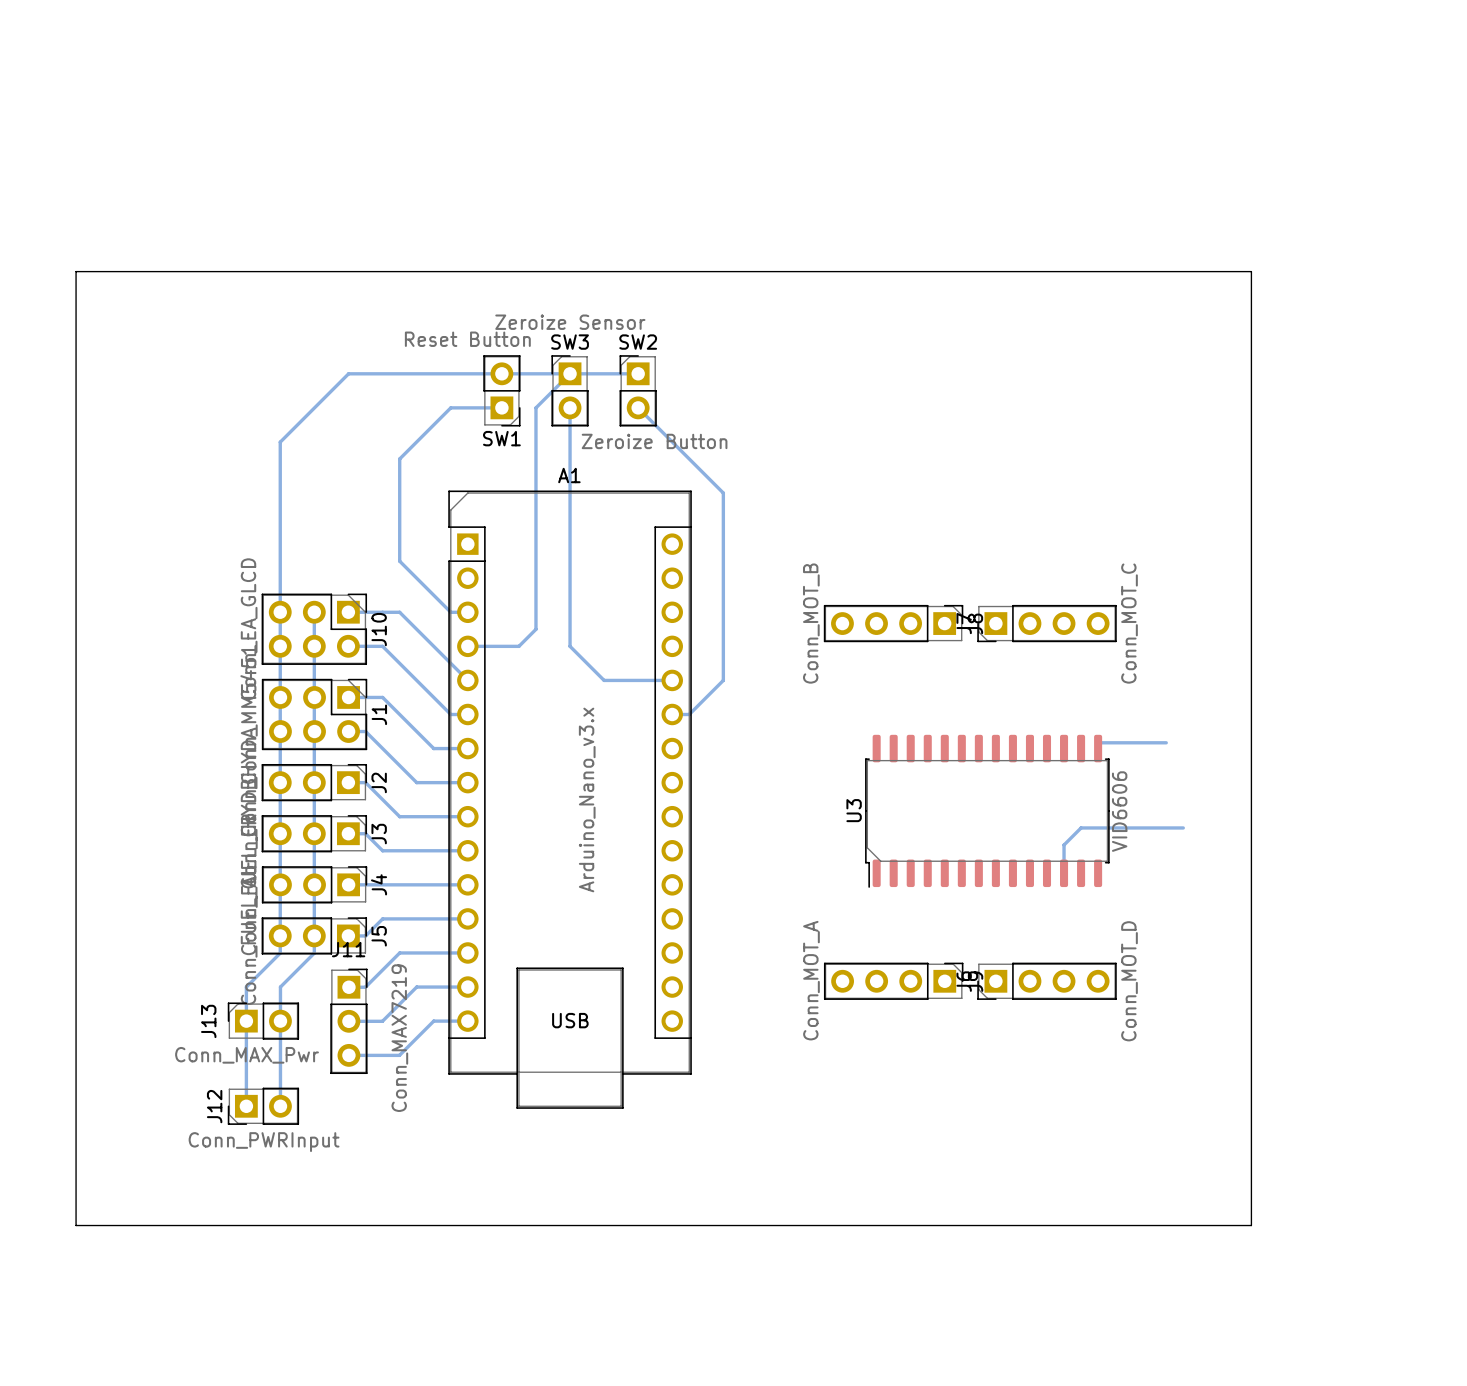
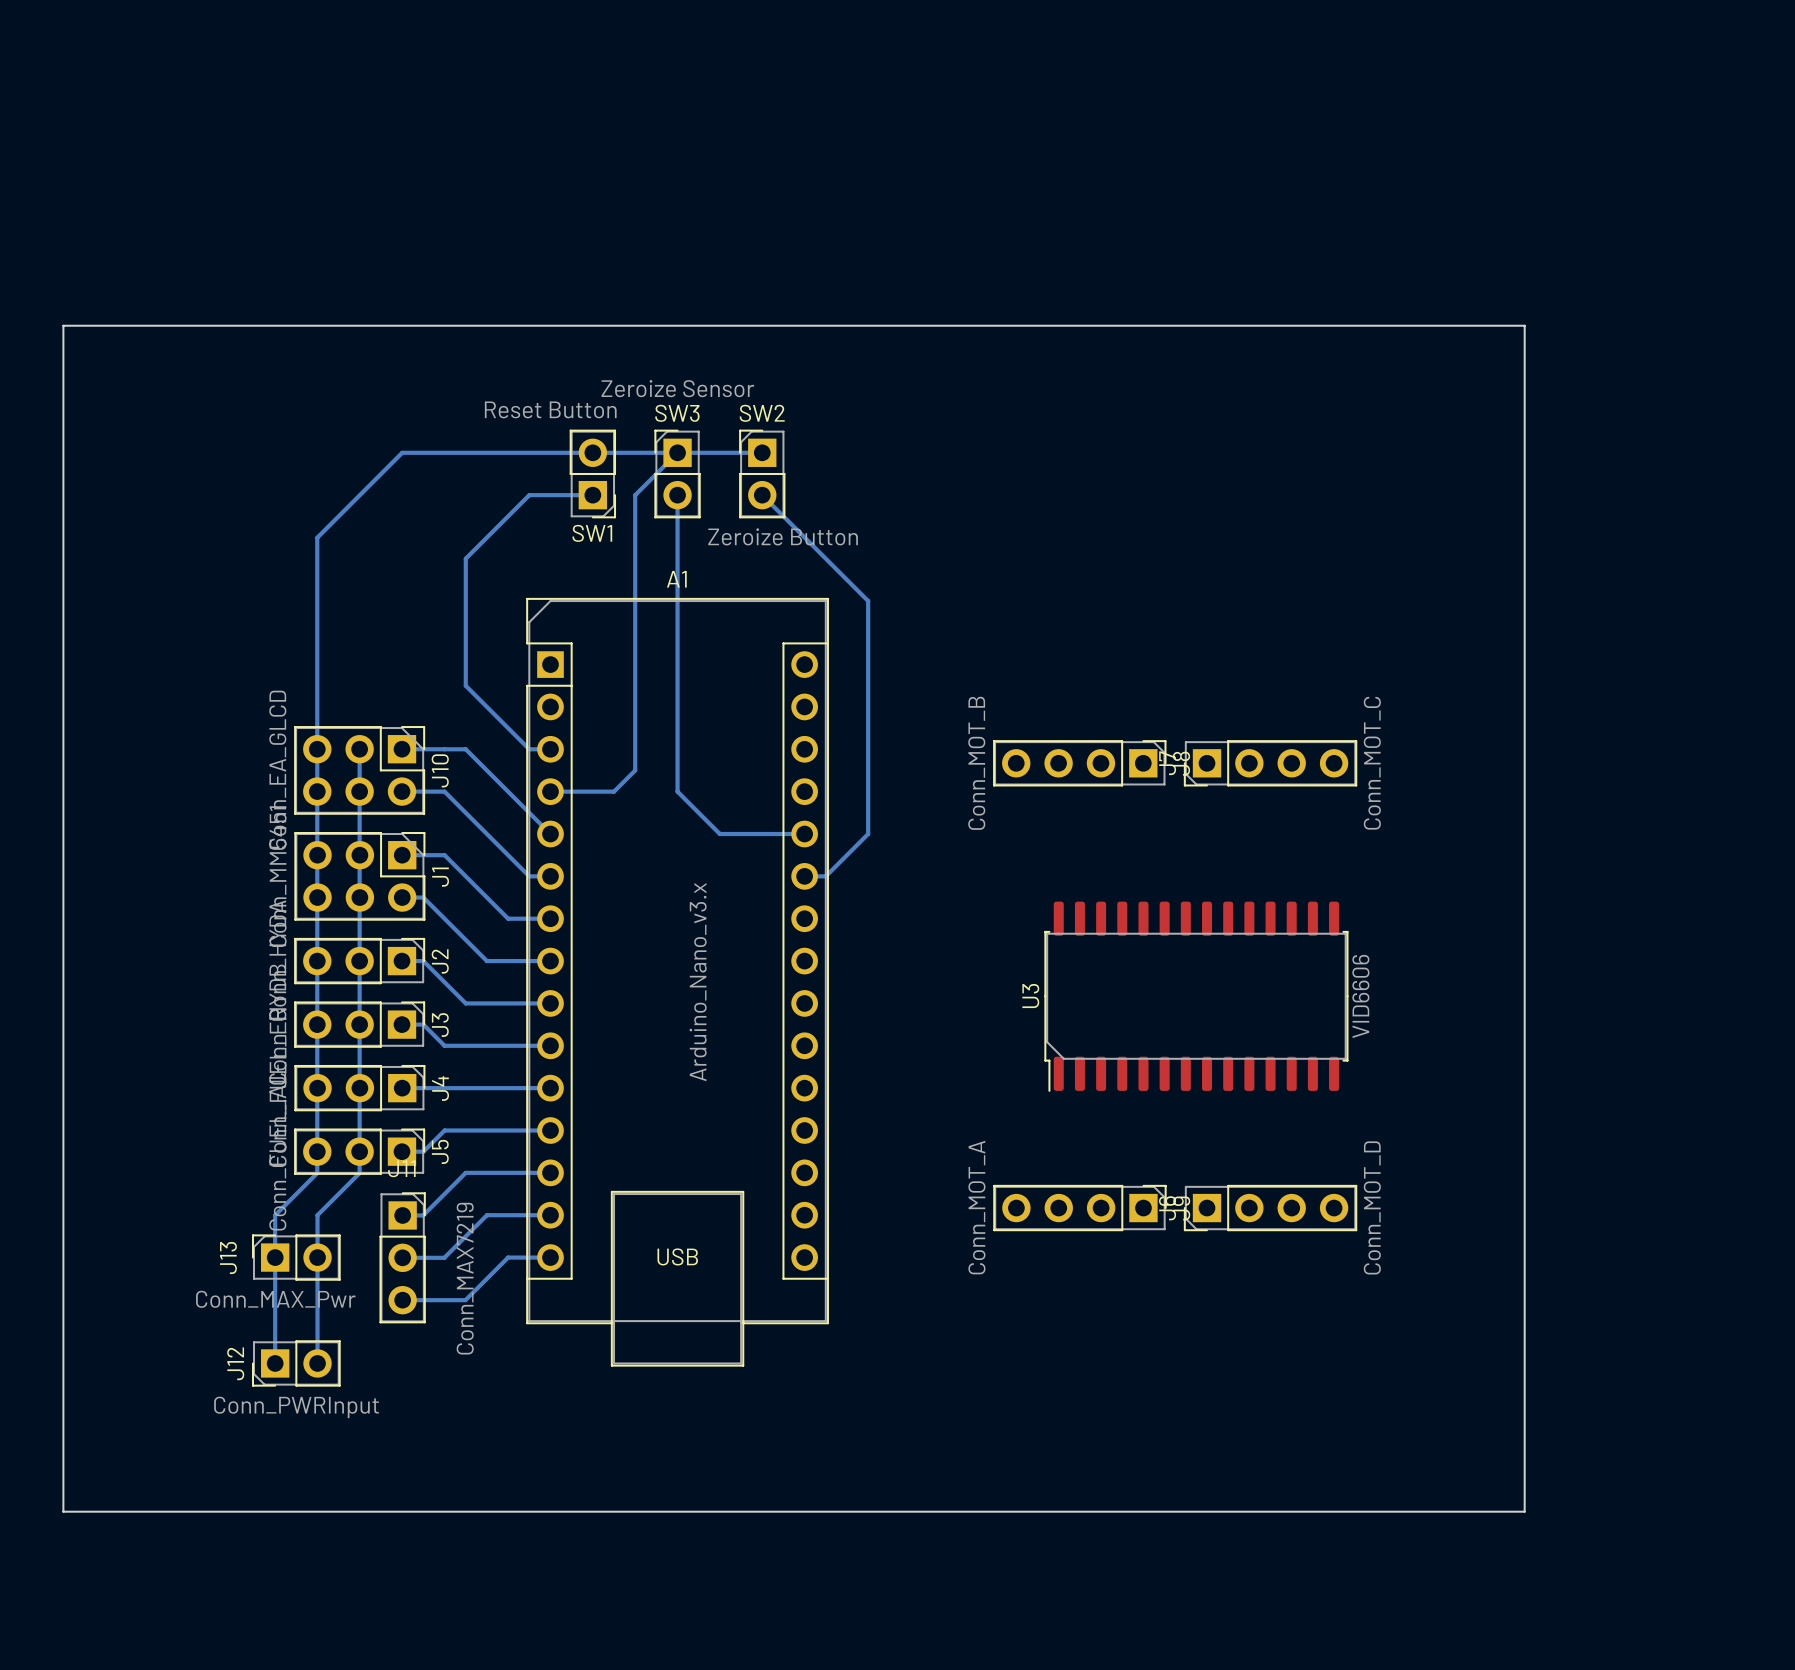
bottom track: (1098, 742) (1166, 742) -> none
bottom track: (1183, 827) (1081, 827) (1064, 845) (1064, 862) -> none

